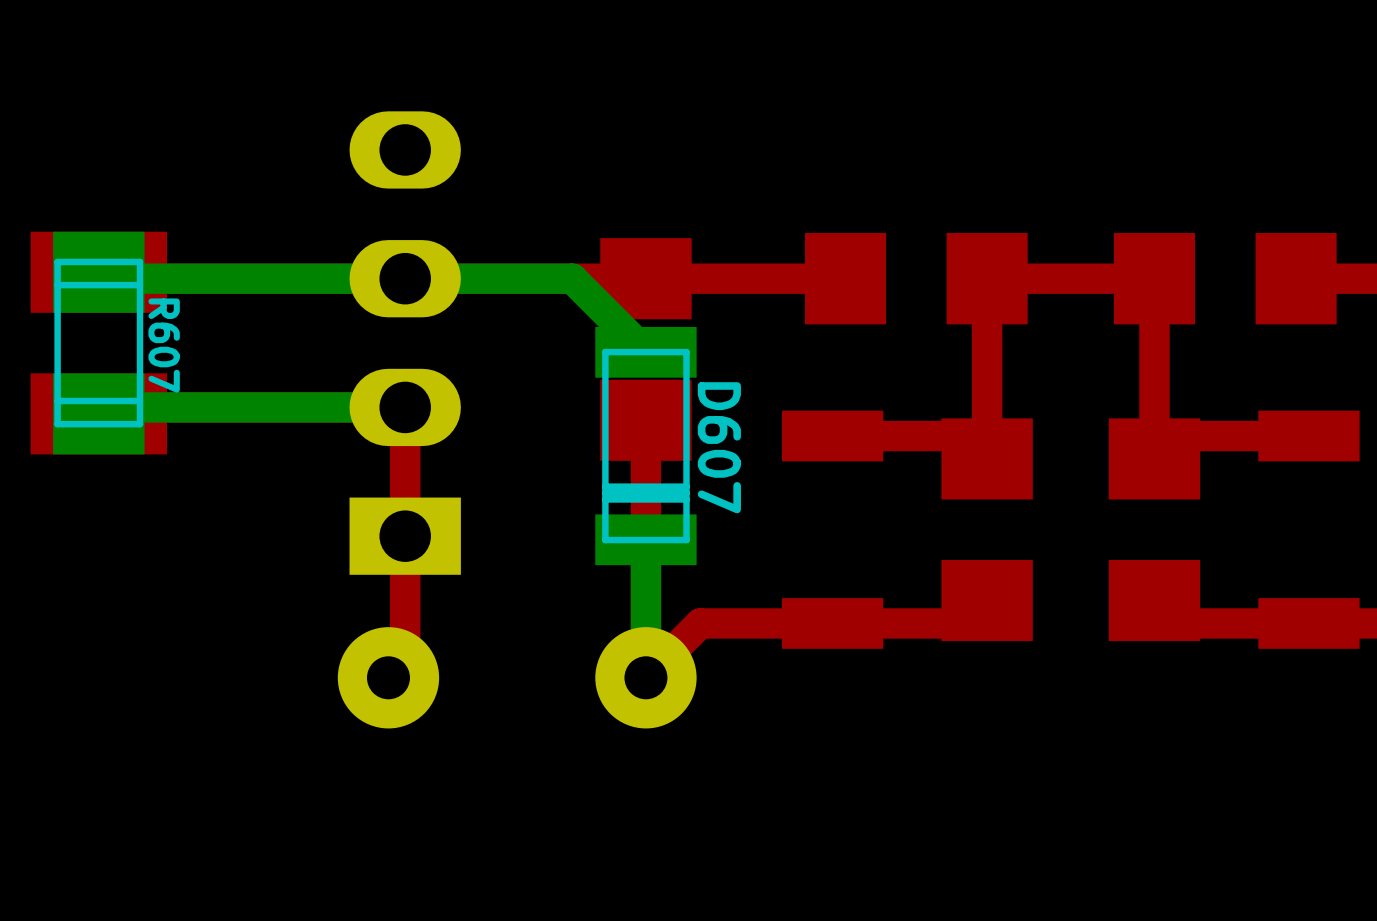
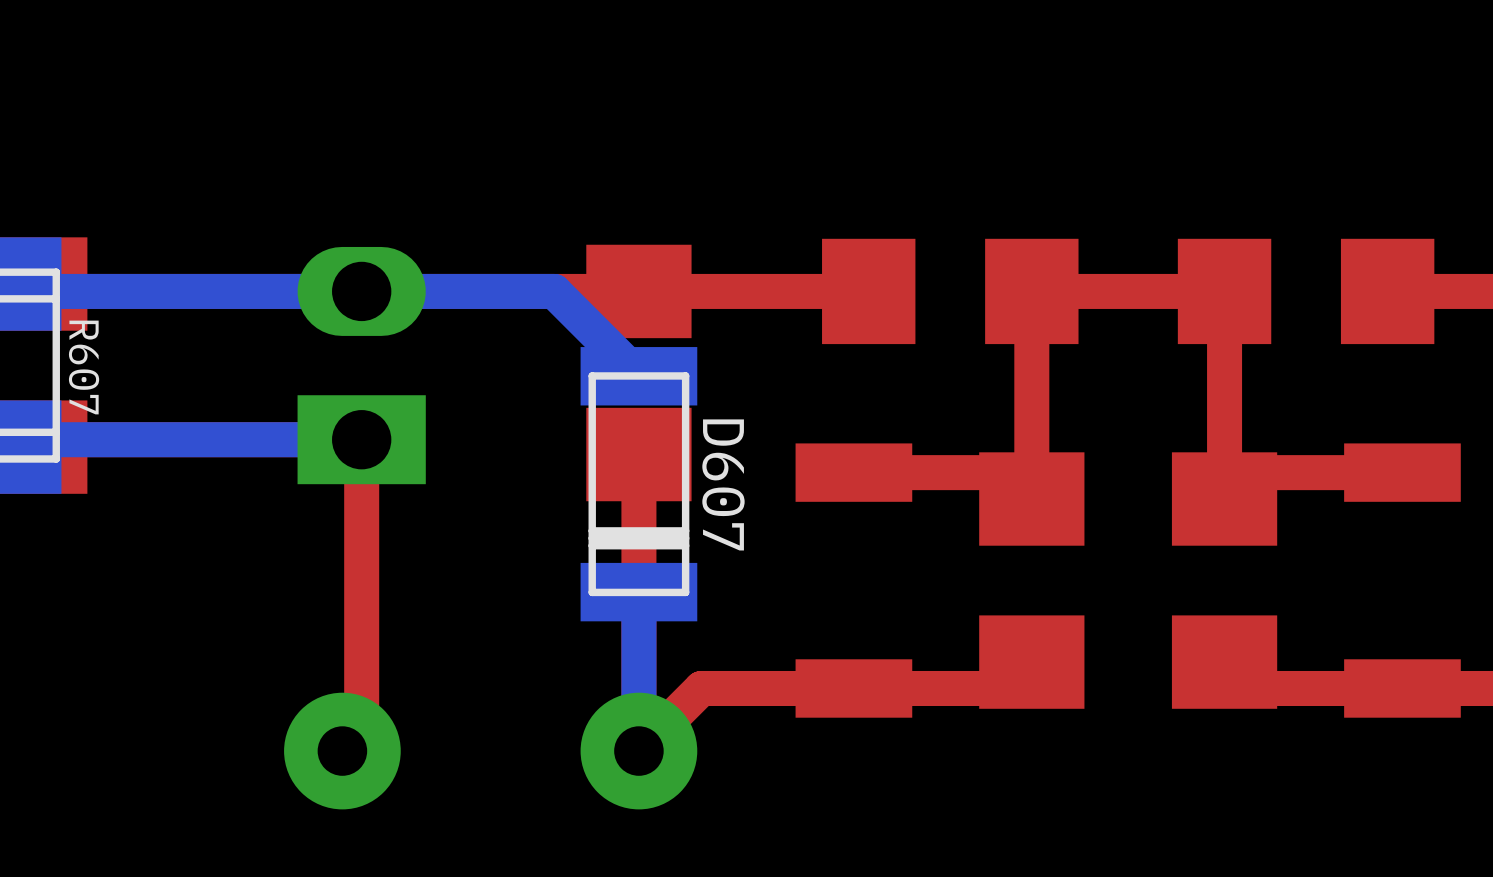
part footprint: [349, 111, 461, 575] -> [297, 246, 426, 485]

